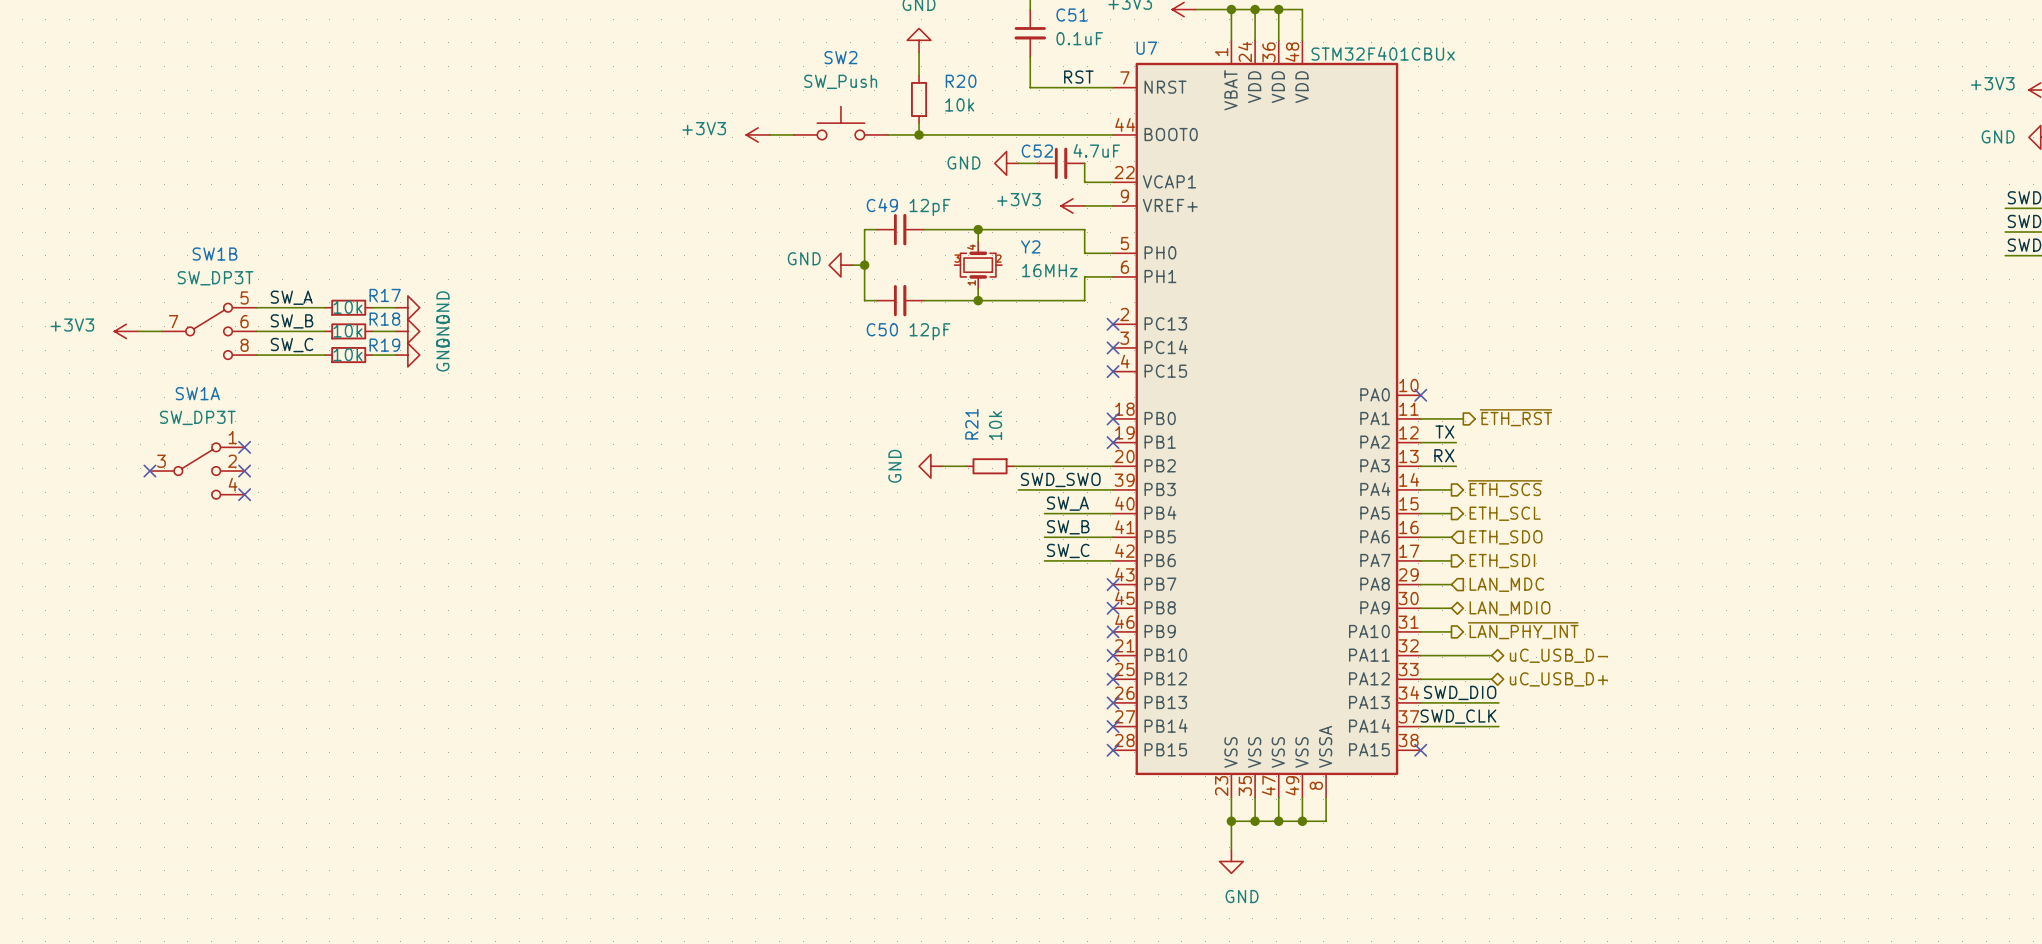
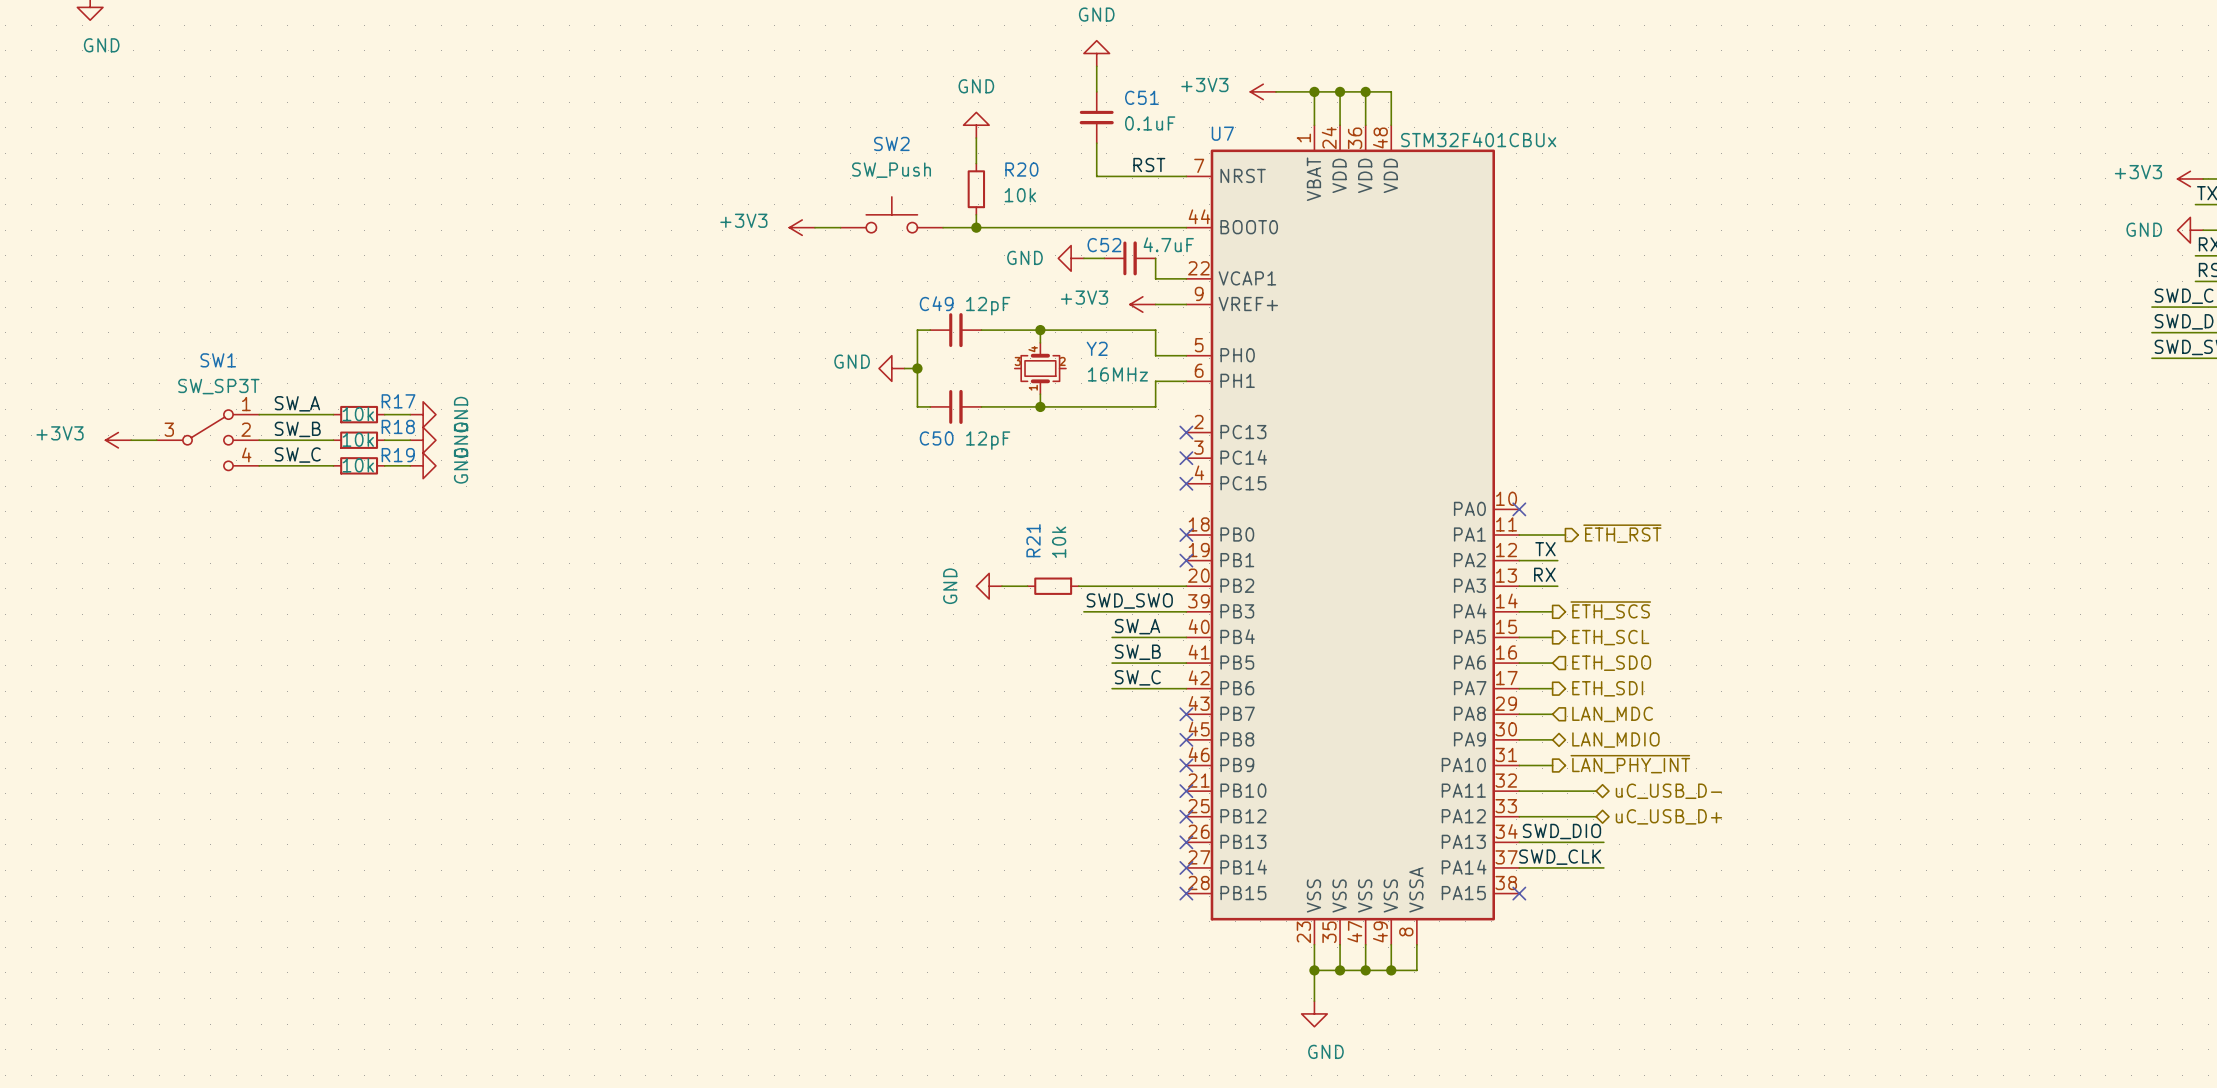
SW1B name: SW1B (215, 254) -> SW1 (218, 360)
SW1B value: SW_DP3T (215, 278) -> SW_SP3T (218, 386)
SW1B pin number: 5 (244, 297) -> 1 (246, 404)
SW1B pin number: 7 (173, 321) -> 3 (169, 429)
SW1B pin number: 6 (244, 321) -> 2 (246, 429)
SW1B pin number: 8 (244, 345) -> 4 (246, 454)
no-connect mark: (244, 447) -> none
no-connect mark: (149, 471) -> none
SW1A: SW_DP3T (197, 471) -> none
no-connect mark: (244, 471) -> none
no-connect mark: (244, 494) -> none

